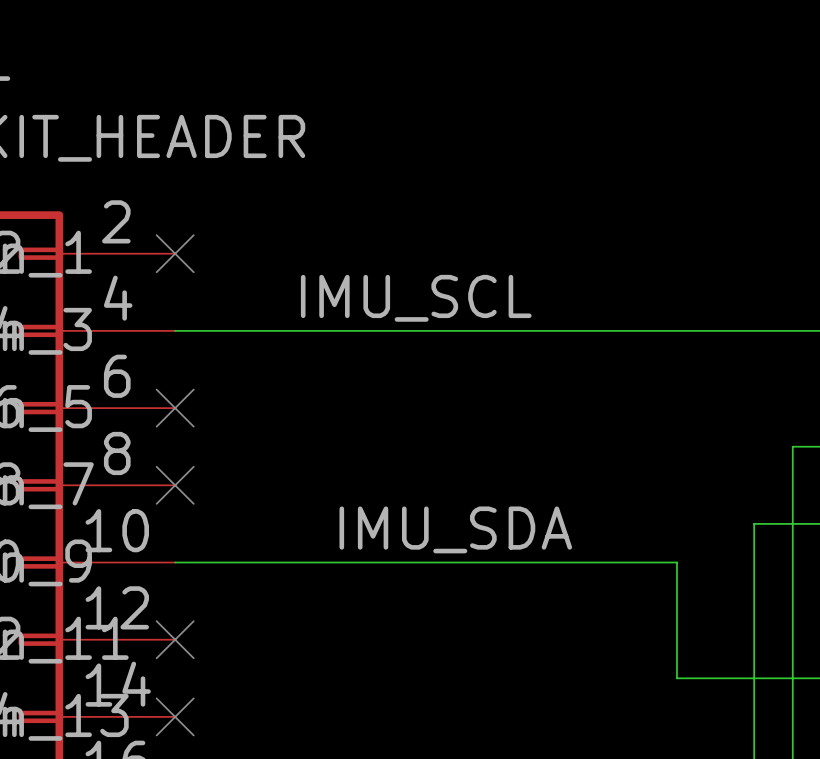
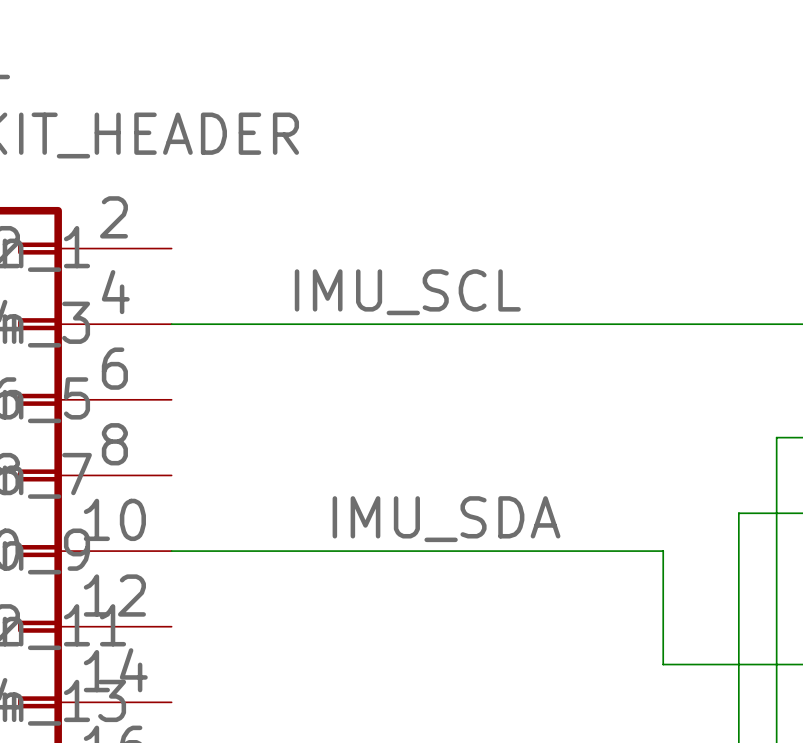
no-connect mark: (175, 253) -> none
no-connect mark: (175, 408) -> none
no-connect mark: (175, 485) -> none
no-connect mark: (175, 639) -> none
no-connect mark: (175, 716) -> none

